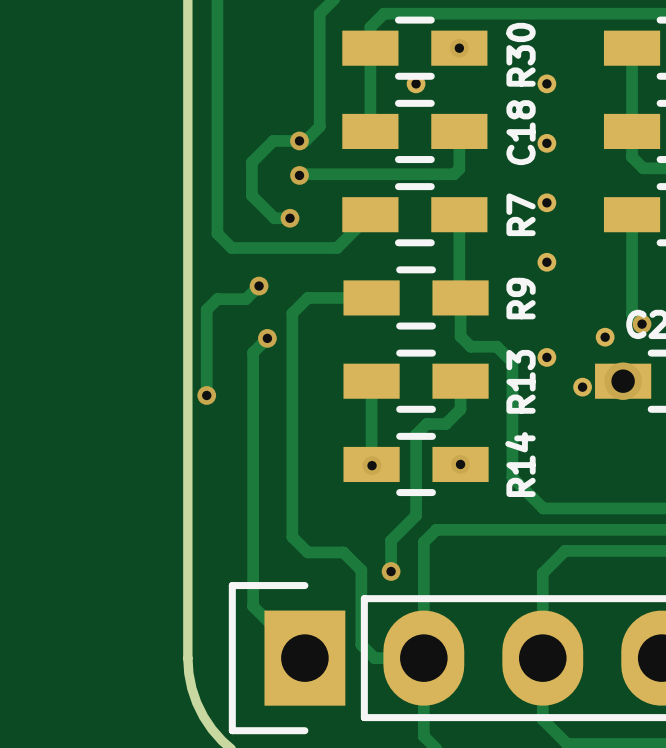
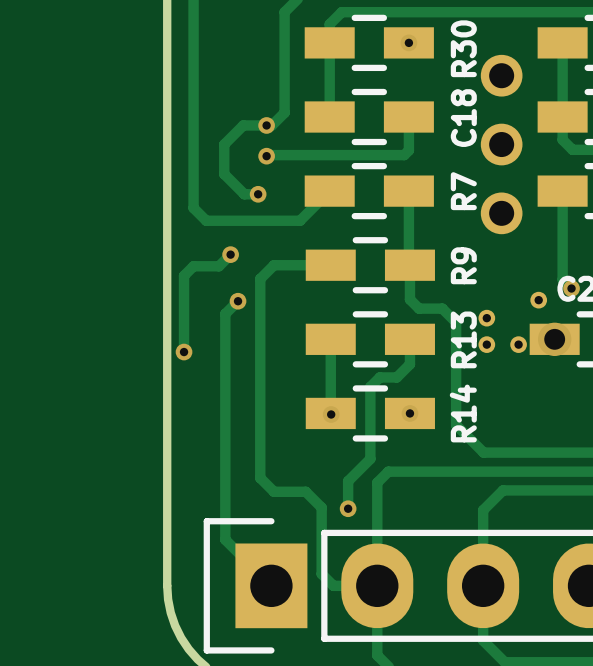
part footprint: [537, 74, 557, 94] -> [480, 54, 523, 97]
part: (416, 83) -> none
part: (546, 143) -> none
part: none -> (501, 144)
part: (546, 202) -> none
part: none -> (501, 213)
part: (546, 262) -> none
part: none -> (486, 344)

